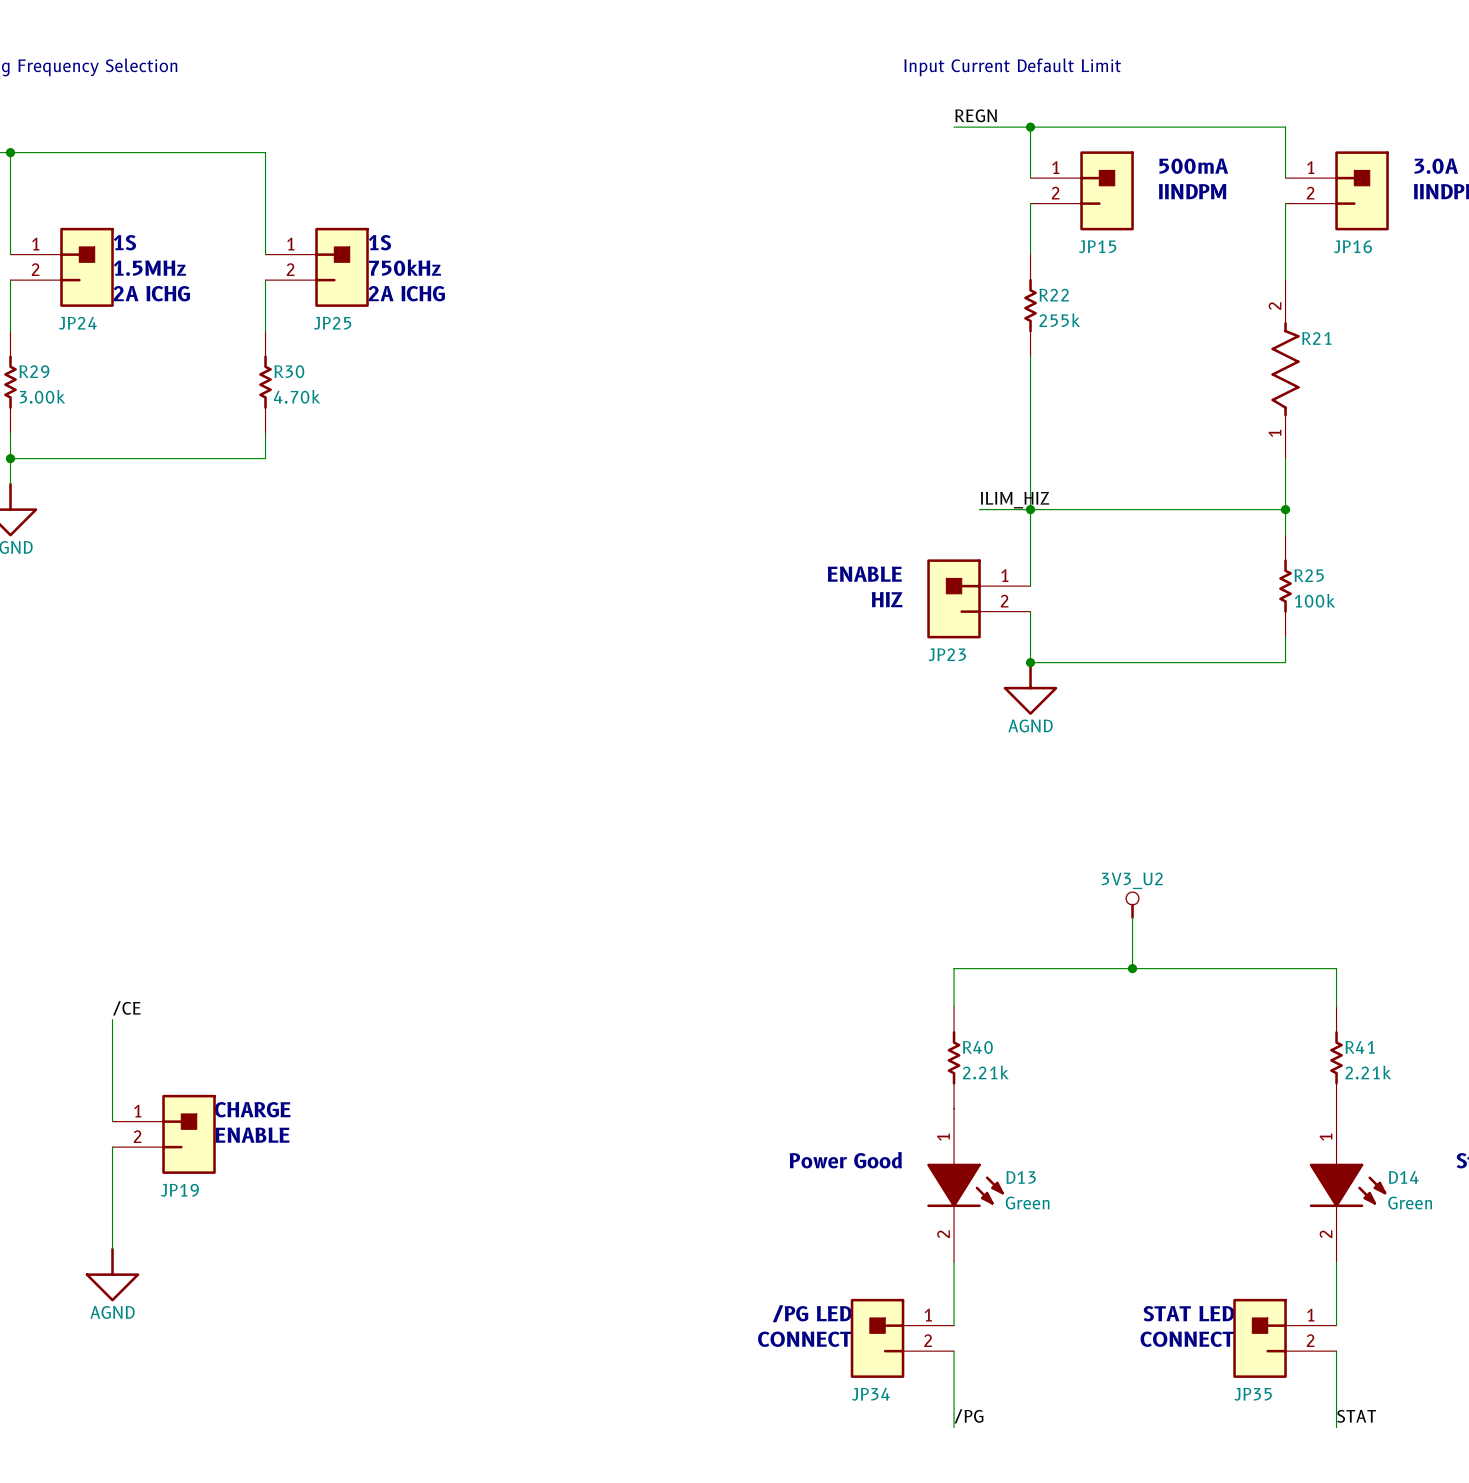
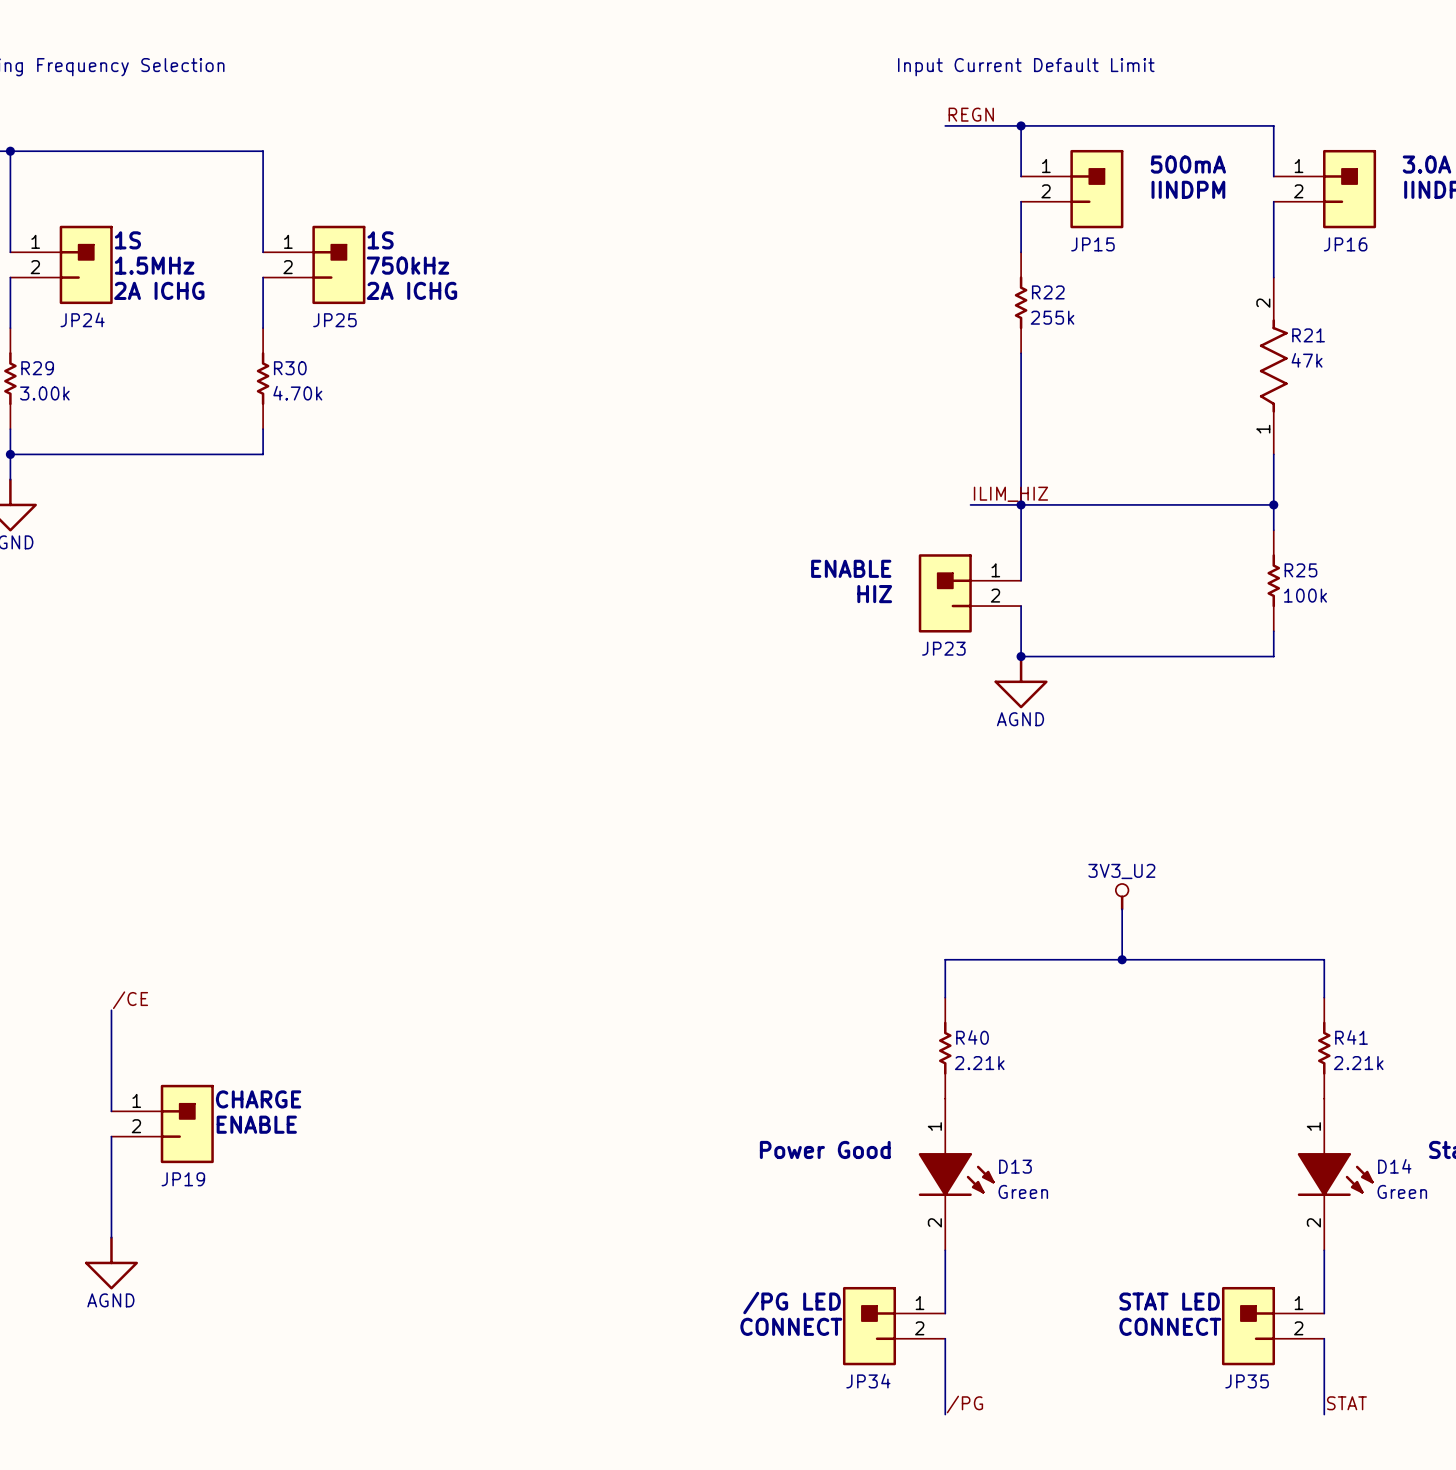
R21 value: none -> 47k (1307, 360)

